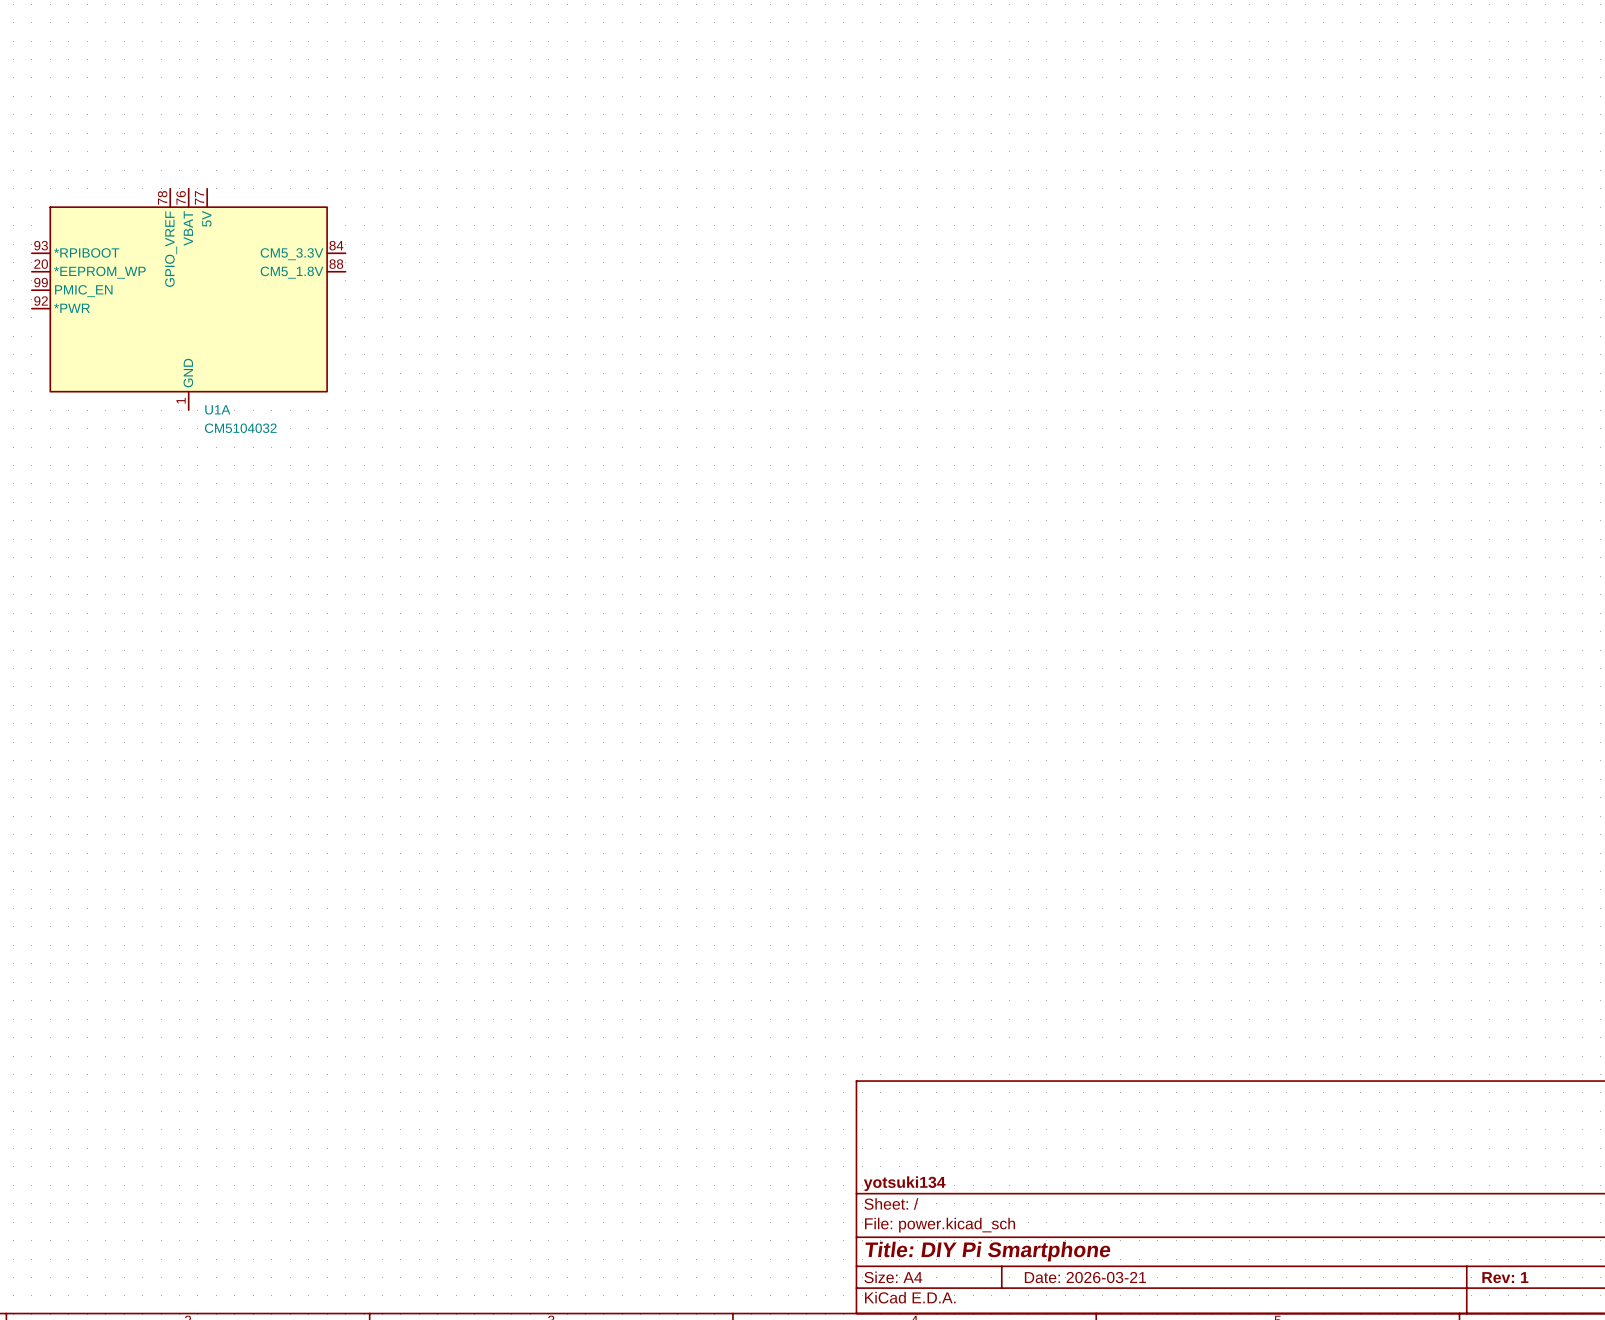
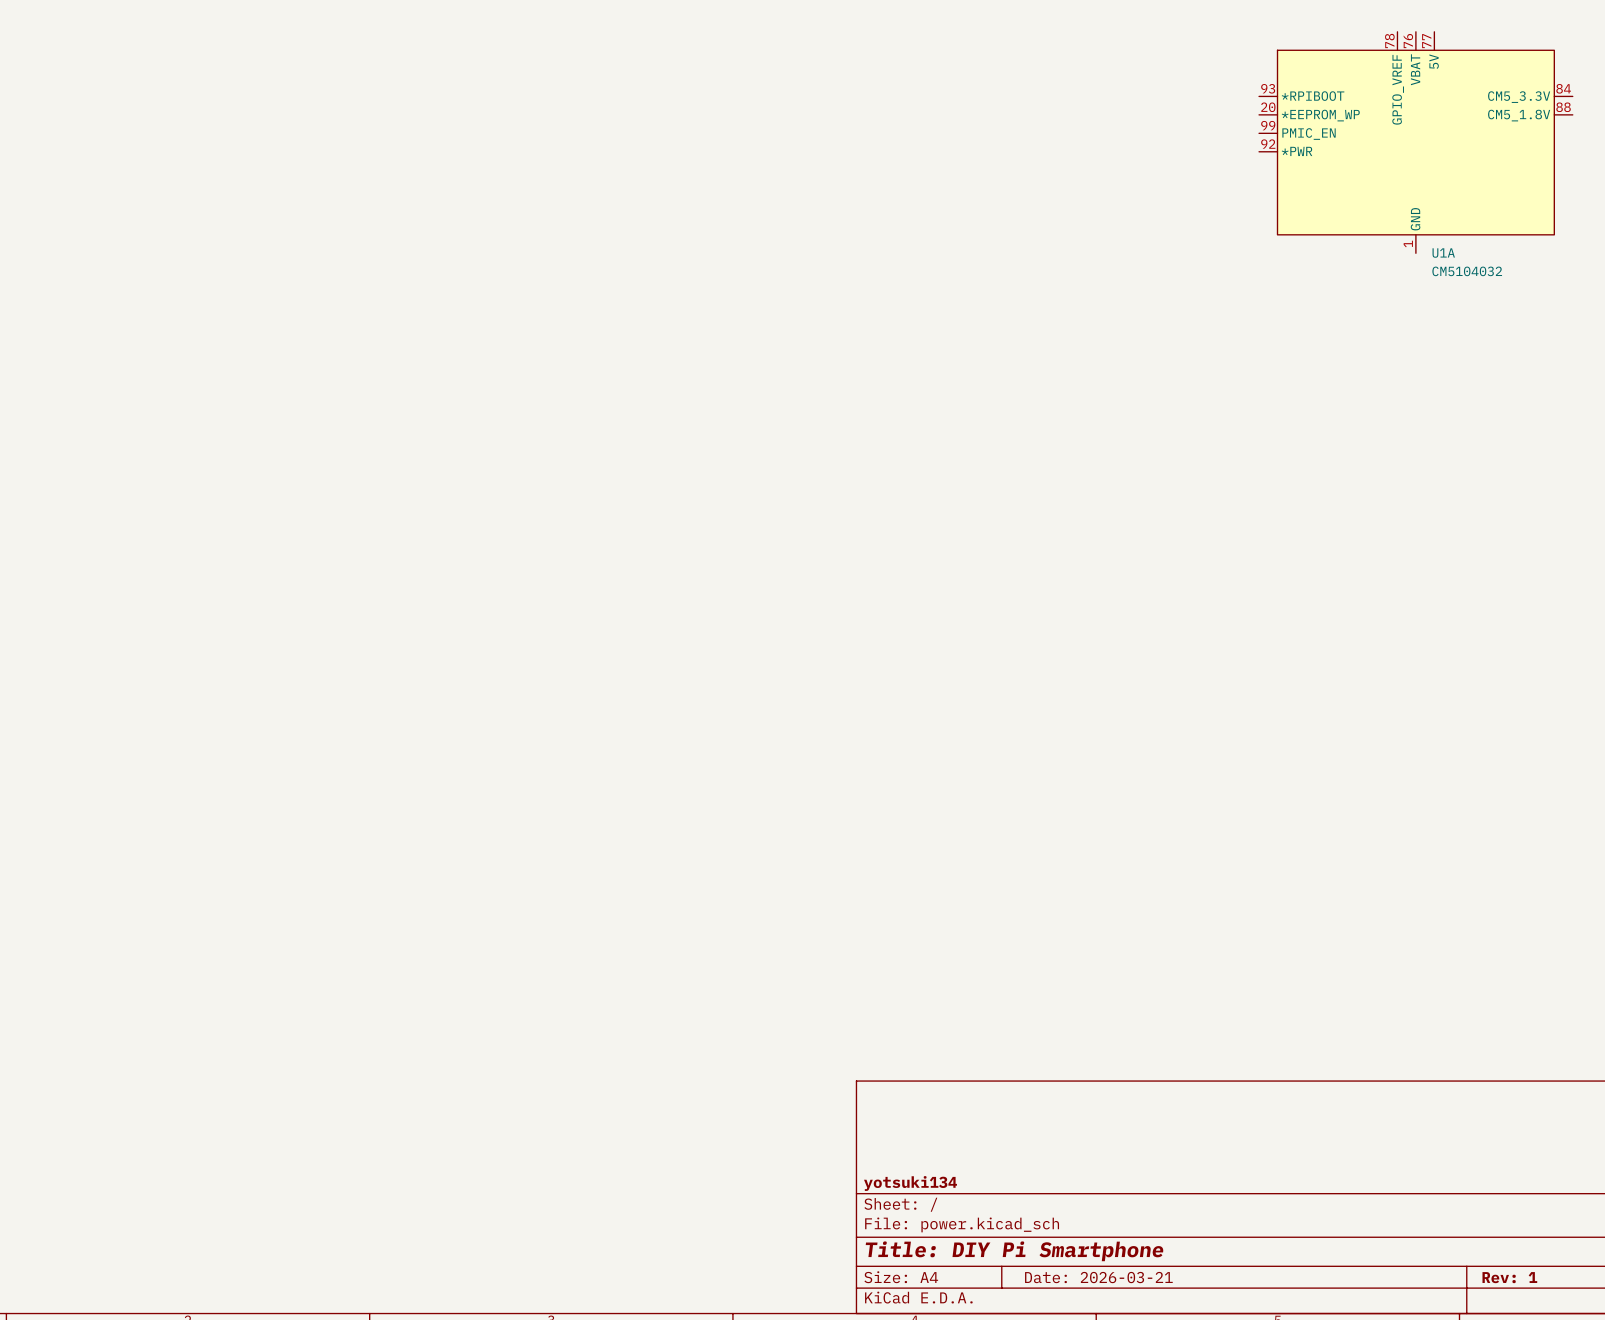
U1A position: (188, 299) -> (1415, 142)

